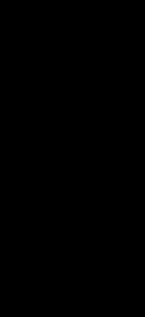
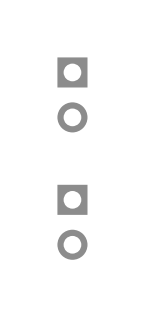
part: none -> (72, 94)
part: none -> (72, 222)

